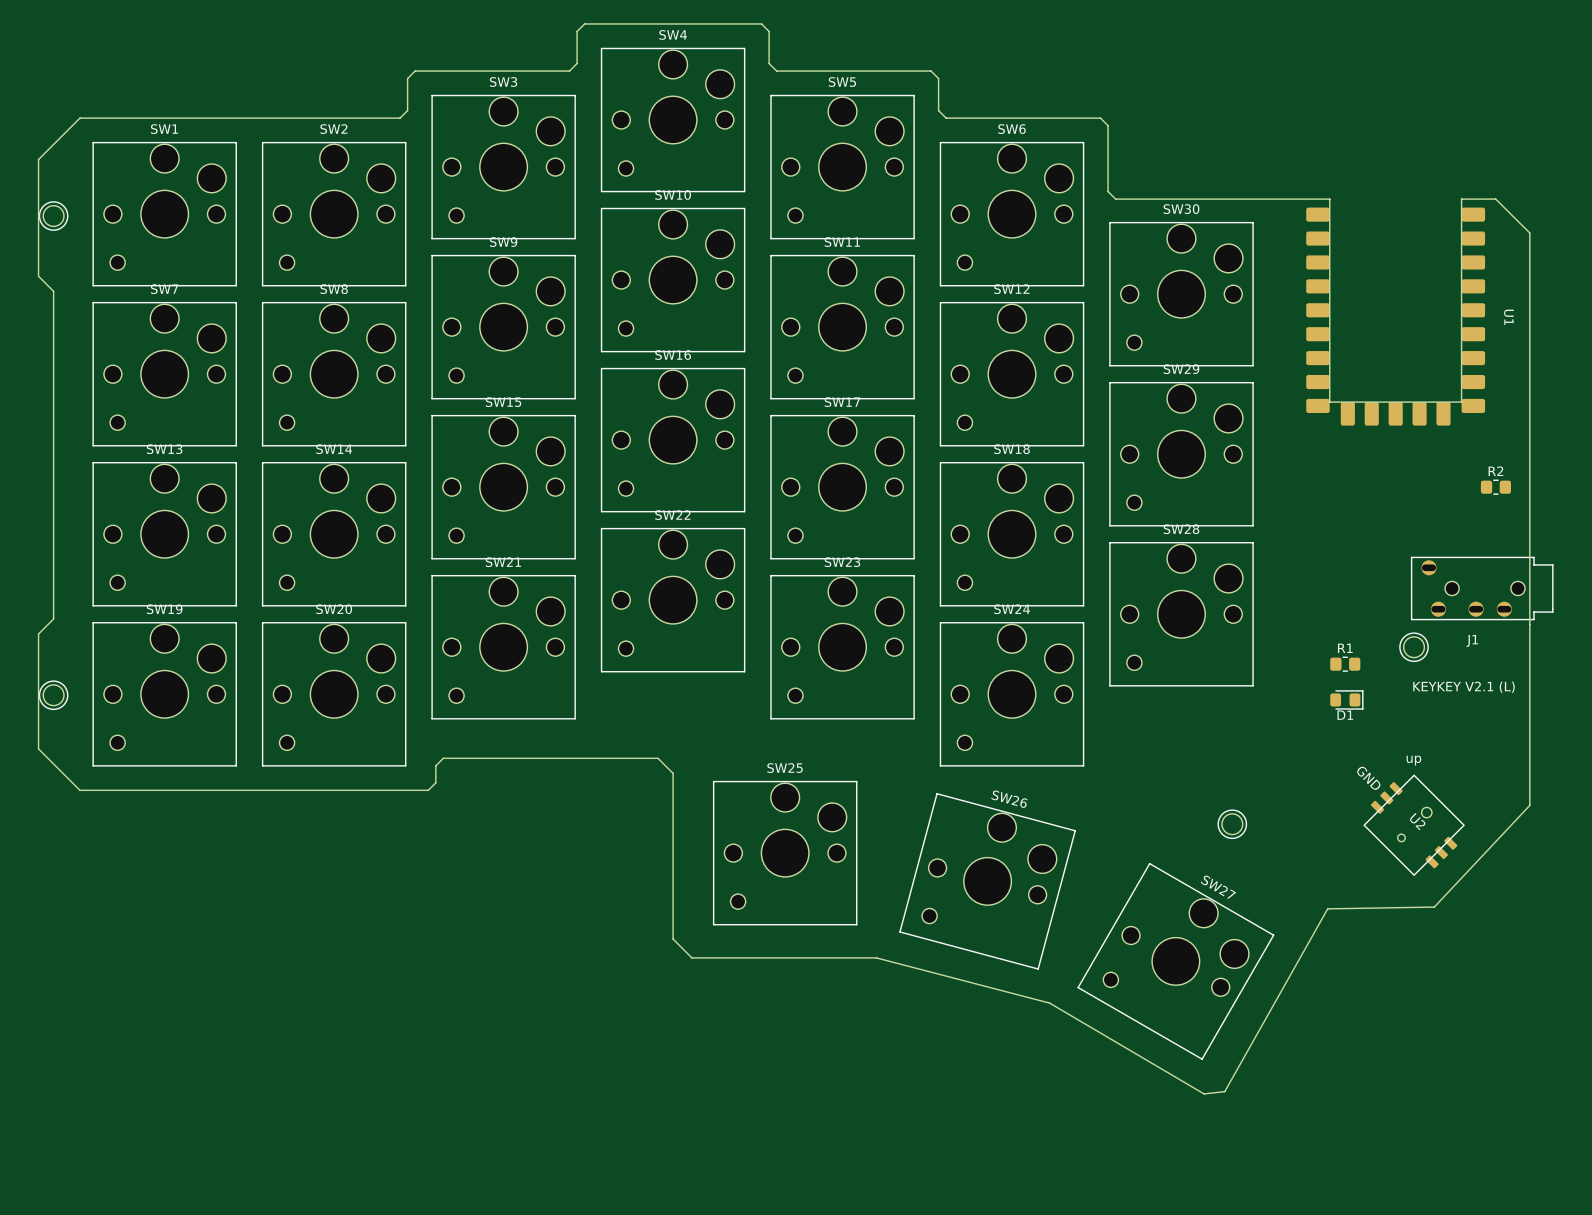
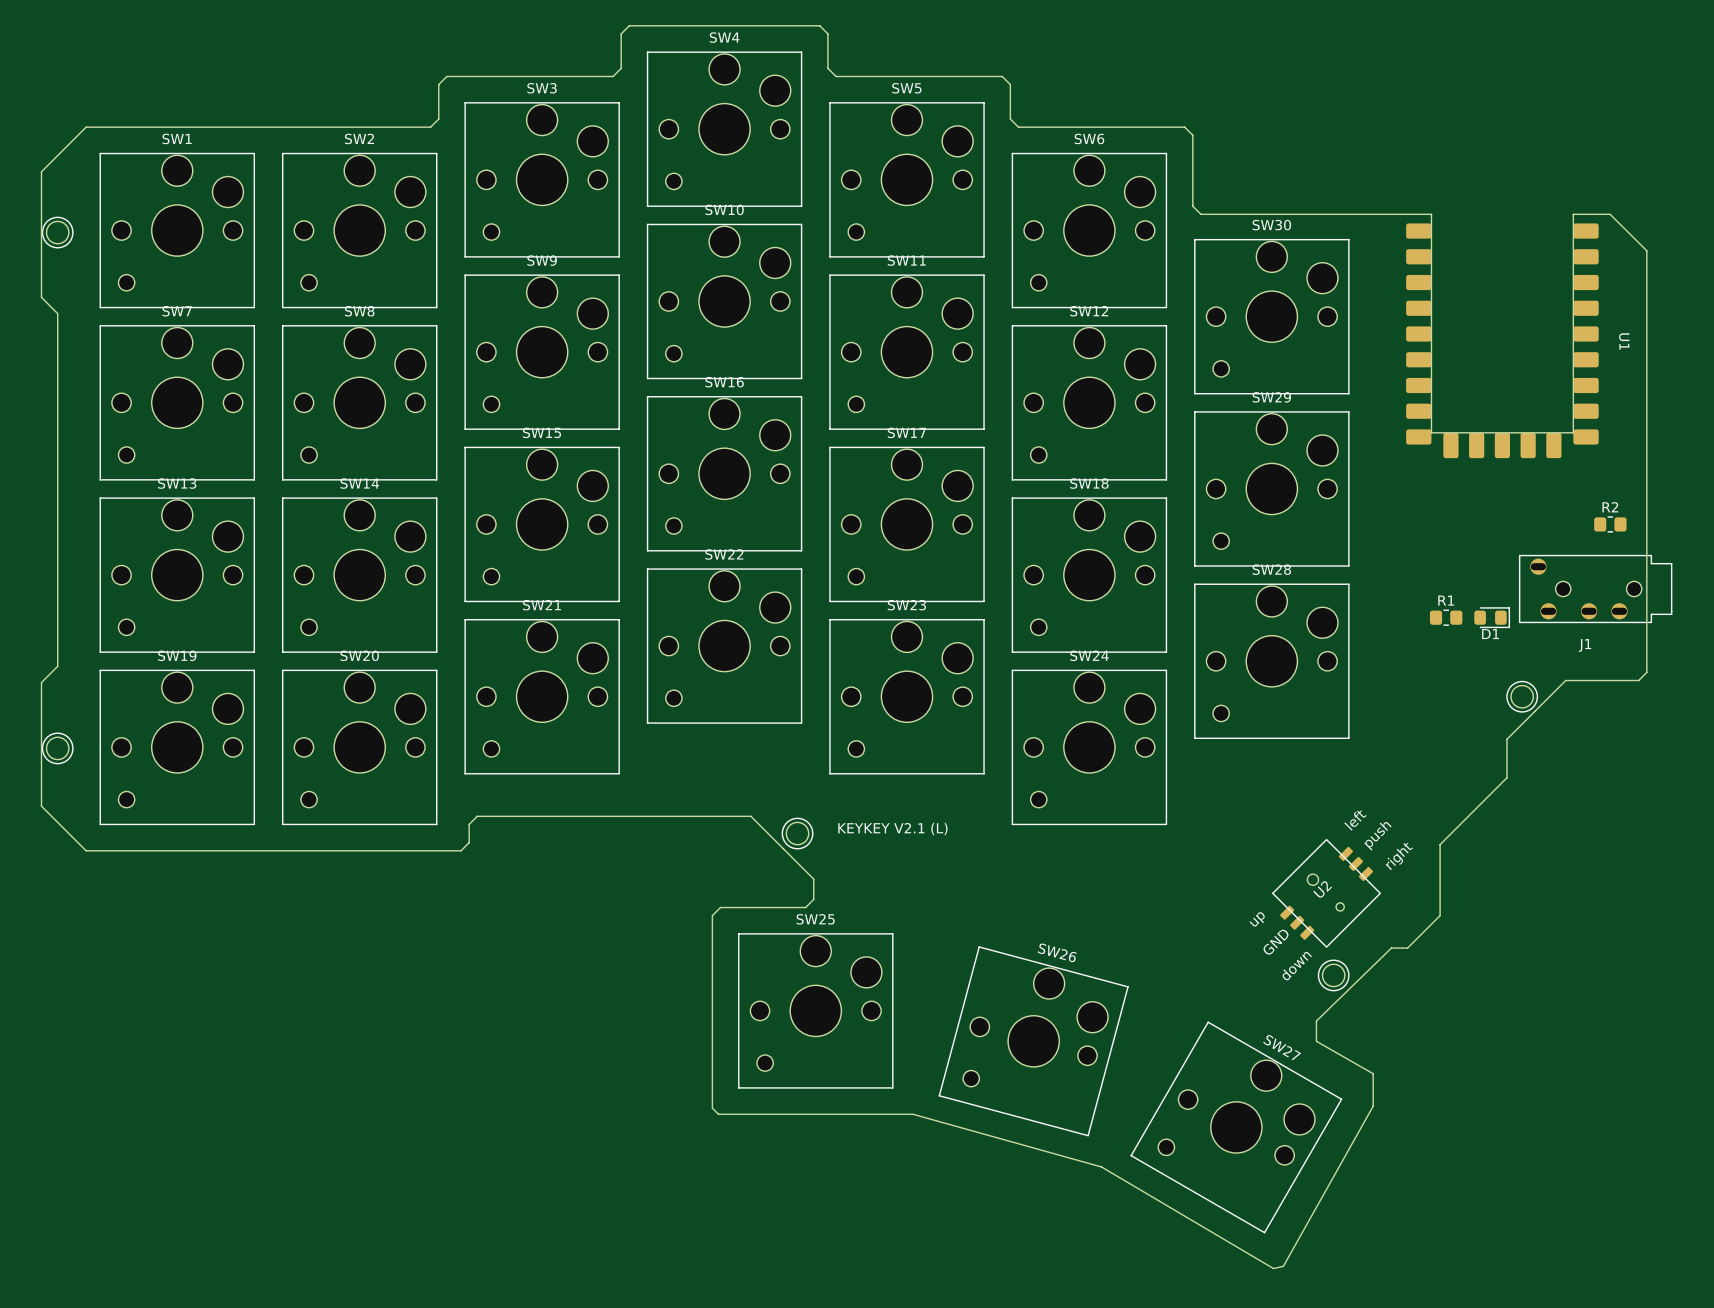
J1 position: (1482, 588) -> (1595, 589)
board edge: (1529, 624) (1529, 805) (1434, 907) (1327, 908) (1224, 1091) (1204, 1093) (1049, 1003) (876, 957) (691, 957) (673, 939) (673, 773) (658, 758) -> (1646, 672) (1638, 680) (1565, 680) (1506, 739) (1506, 777) (1440, 844) (1440, 915) (1407, 948) (1391, 948) (1316, 1021) (1316, 1041) (1373, 1073) (1373, 1106) (1283, 1266) (1273, 1268) (1101, 1166) (913, 1114) (718, 1114) (712, 1108) (712, 915) (720, 907) (805, 907) (813, 899) (813, 879) (750, 816) (708, 816)
R1 position: (1345, 664) -> (1446, 617)
text: KEYKEY V2.1 (L) (1464, 687) -> none
D1 position: (1346, 699) -> (1492, 617)
drawing: none -> [782, 818, 813, 850]
round board edge: none -> [786, 822, 809, 845]
text: none -> KEYKEY V2.1 (L) (892, 828)
U2 footprint: [1363, 774, 1465, 876] -> [1272, 839, 1381, 948]
drawing position: (1232, 824) -> (1333, 975)
round board edge position: (1232, 824) -> (1333, 975)
SW25 position: (785, 853) -> (815, 1010)
SW26 position: (987, 881) -> (1033, 1041)
SW27 position: (1175, 961) -> (1236, 1127)

